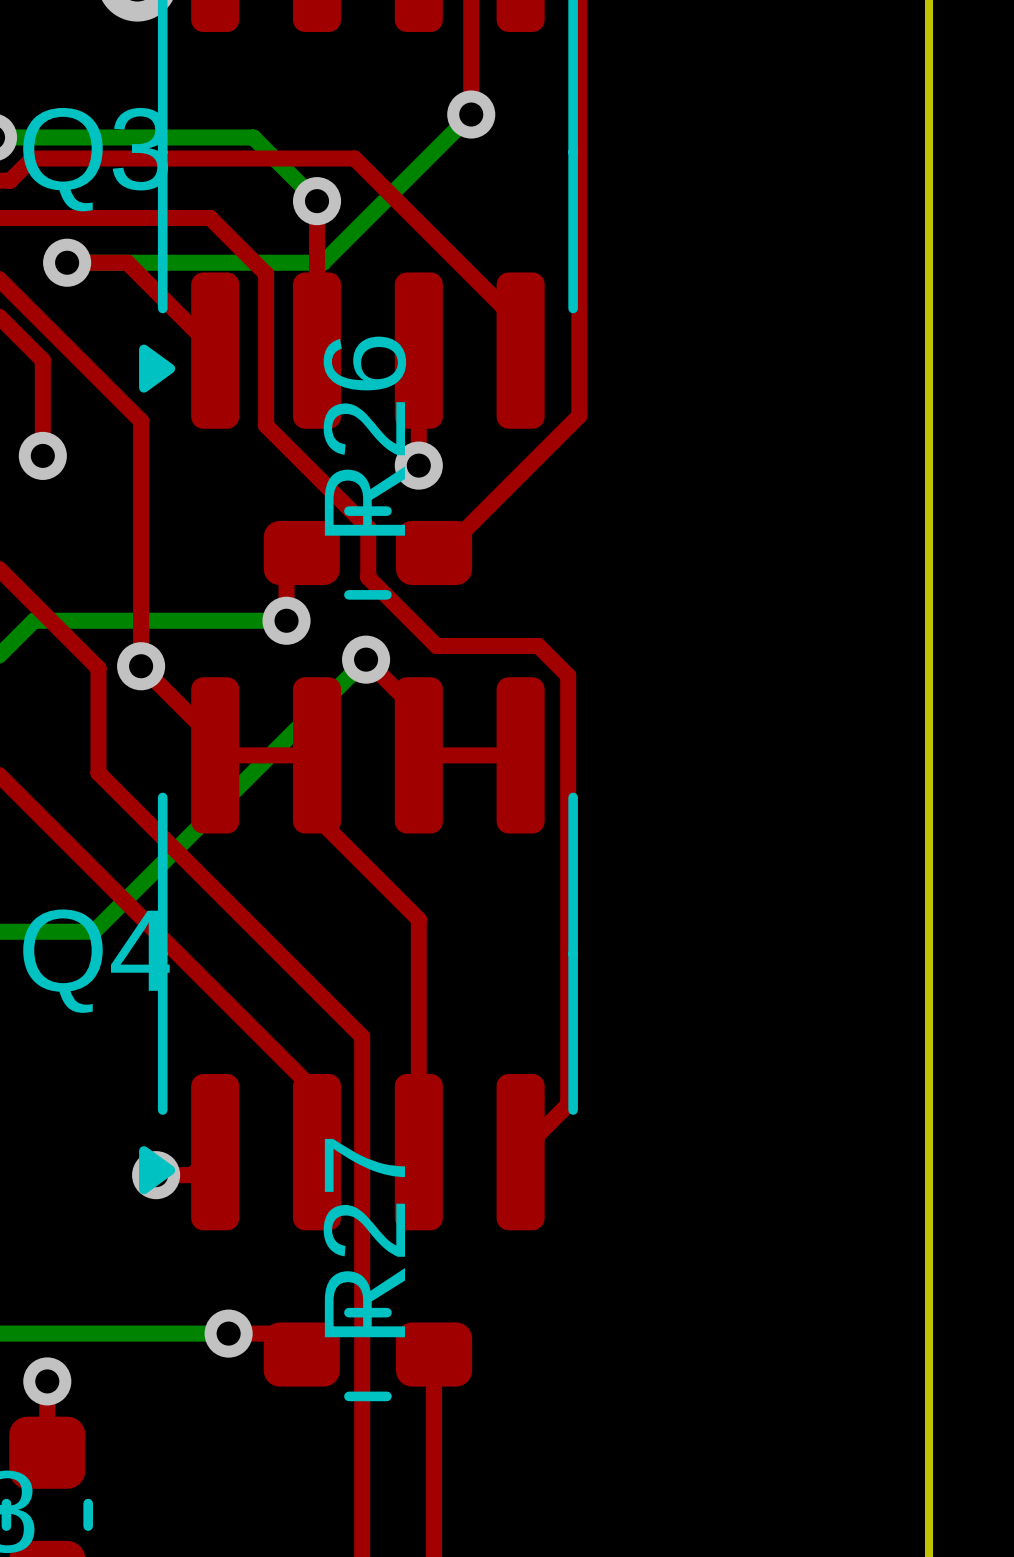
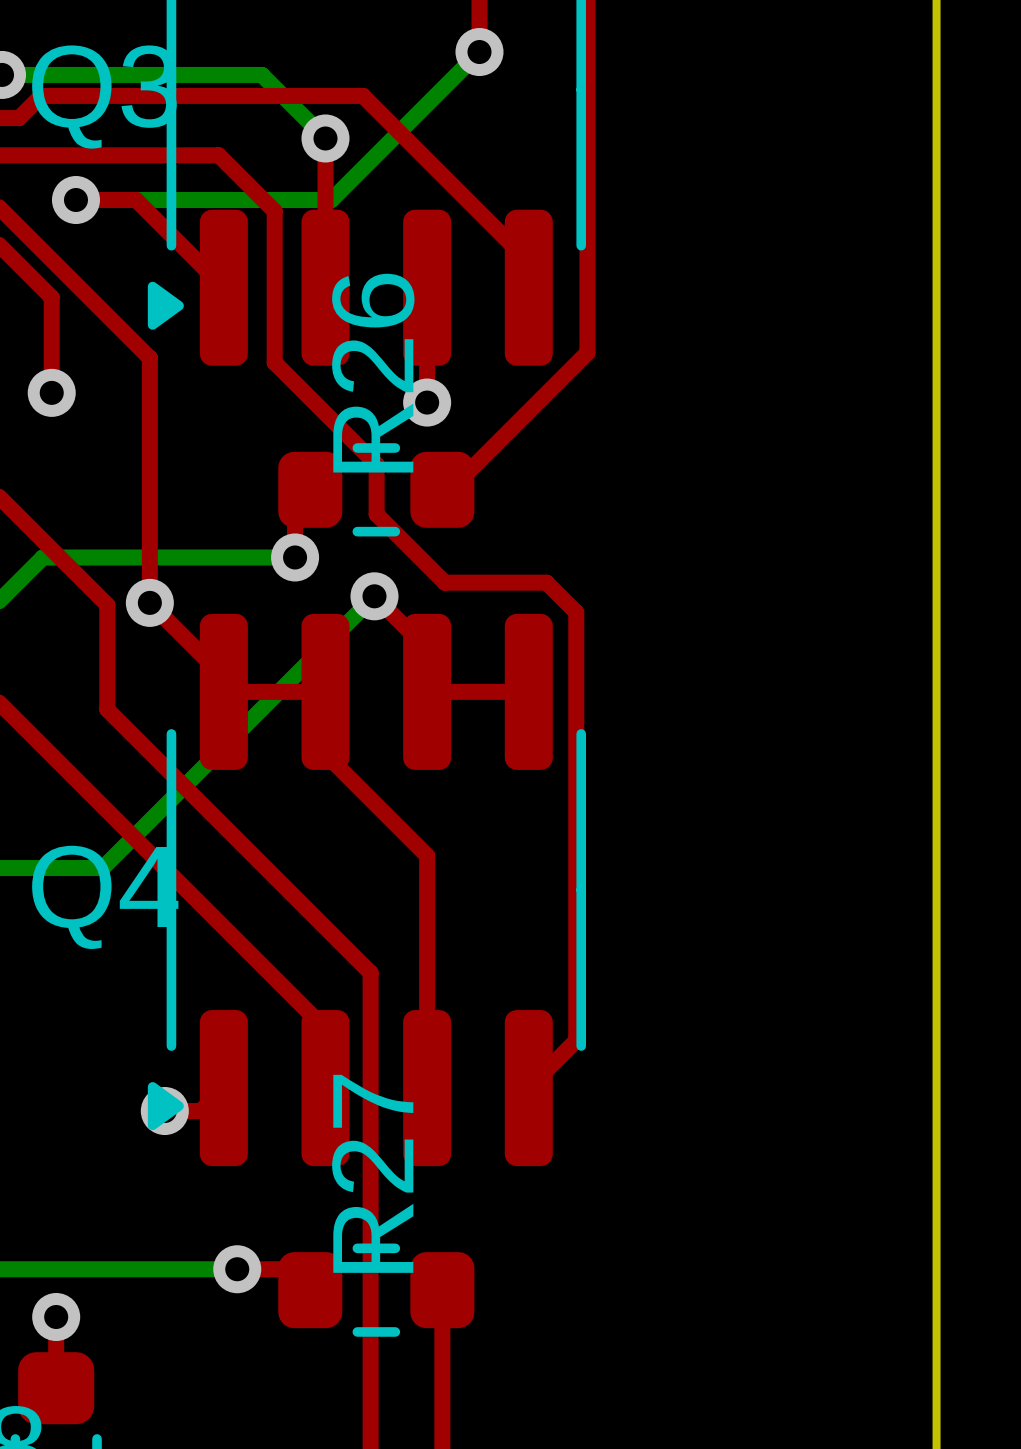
R26 footprint: [263, 506, 473, 600] -> [278, 443, 475, 537]
R27 footprint: [263, 1307, 473, 1402] -> [278, 1243, 475, 1337]

